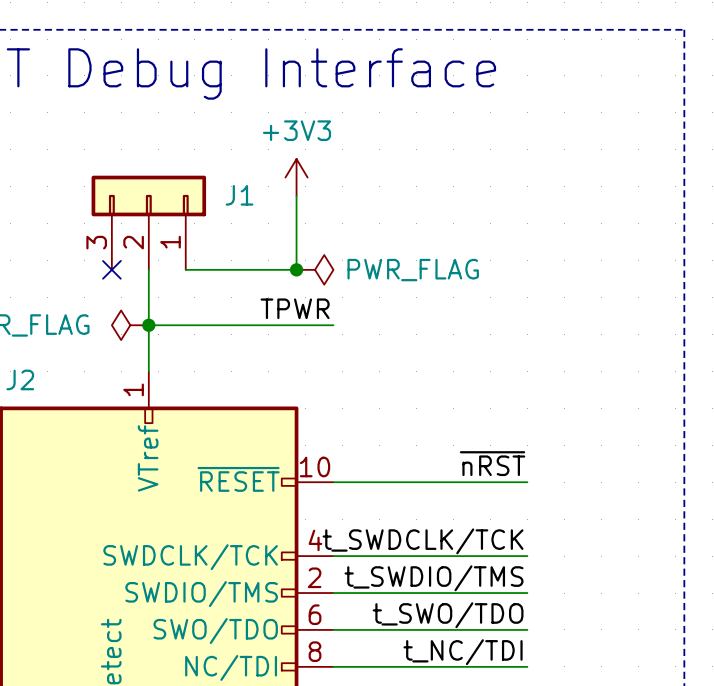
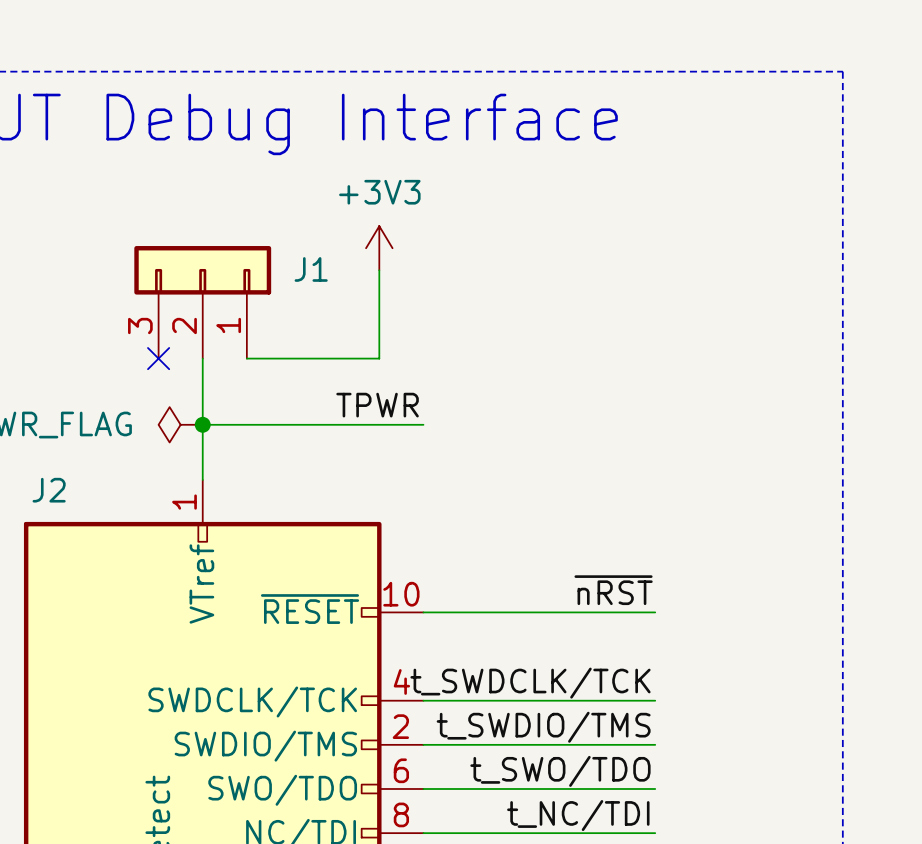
junction: (296, 269) -> none
power symbol: PWR_FLAG (315, 269) -> none

